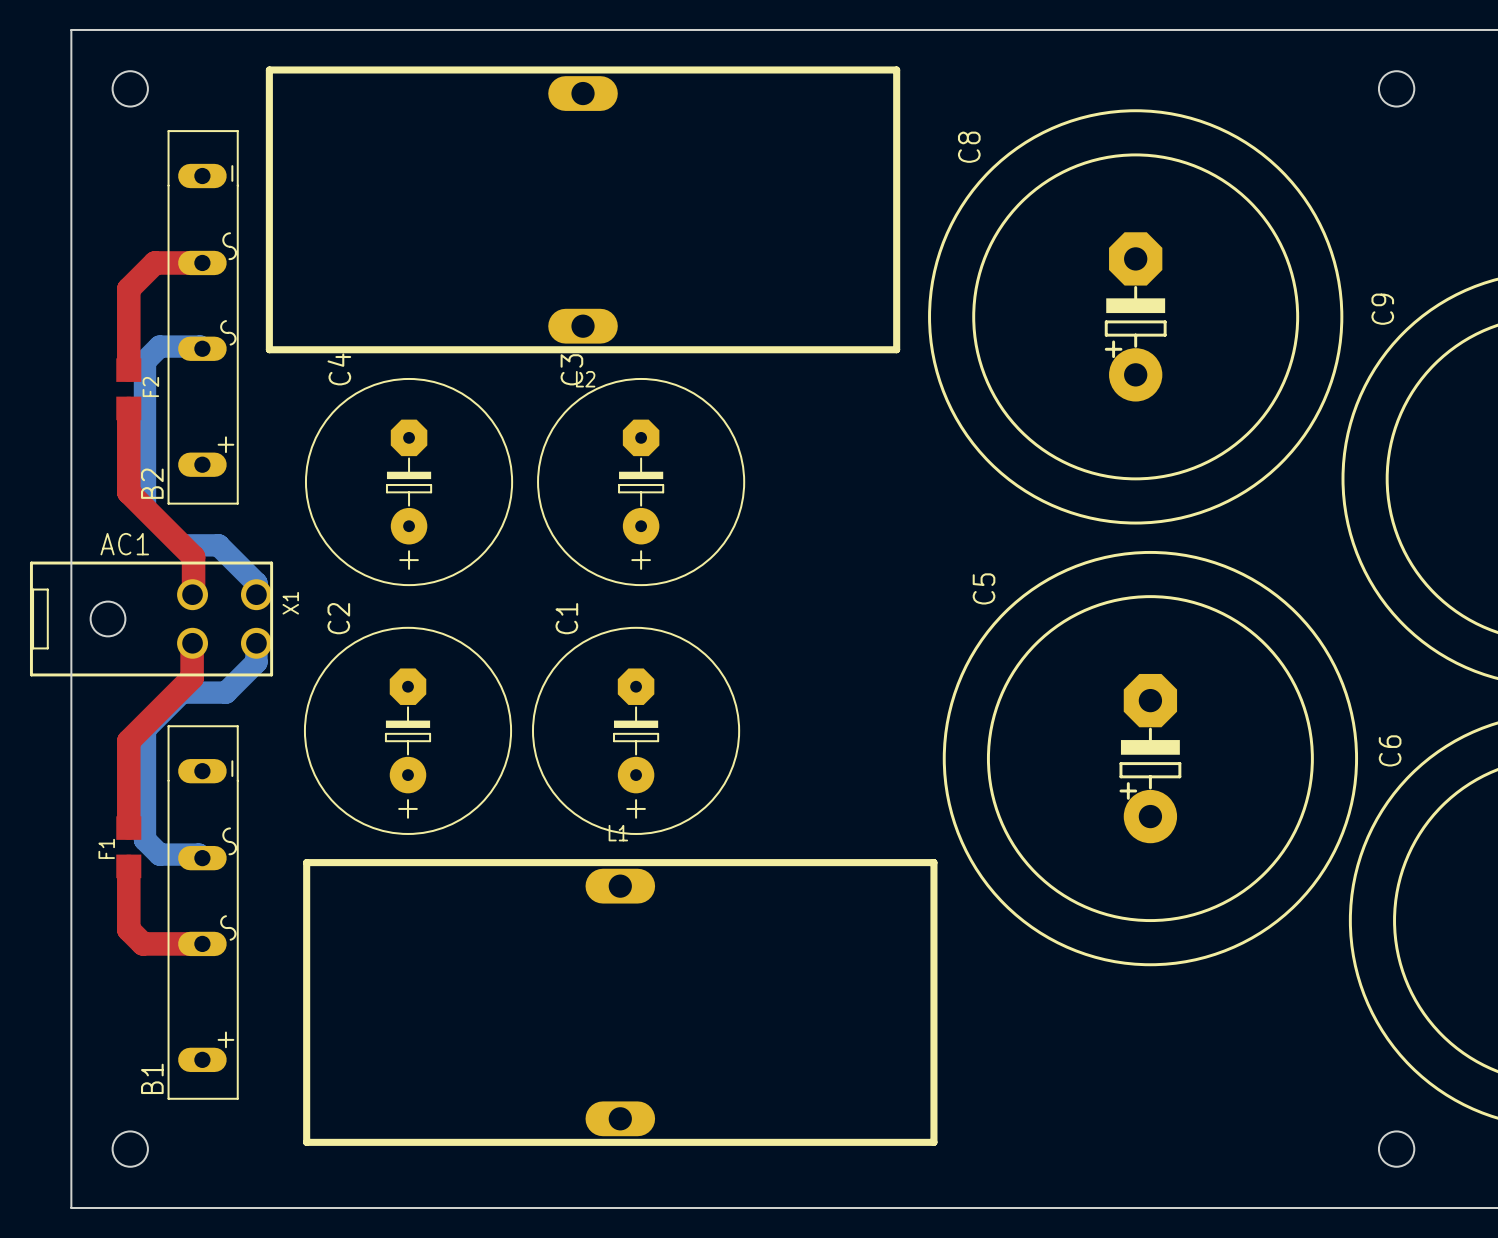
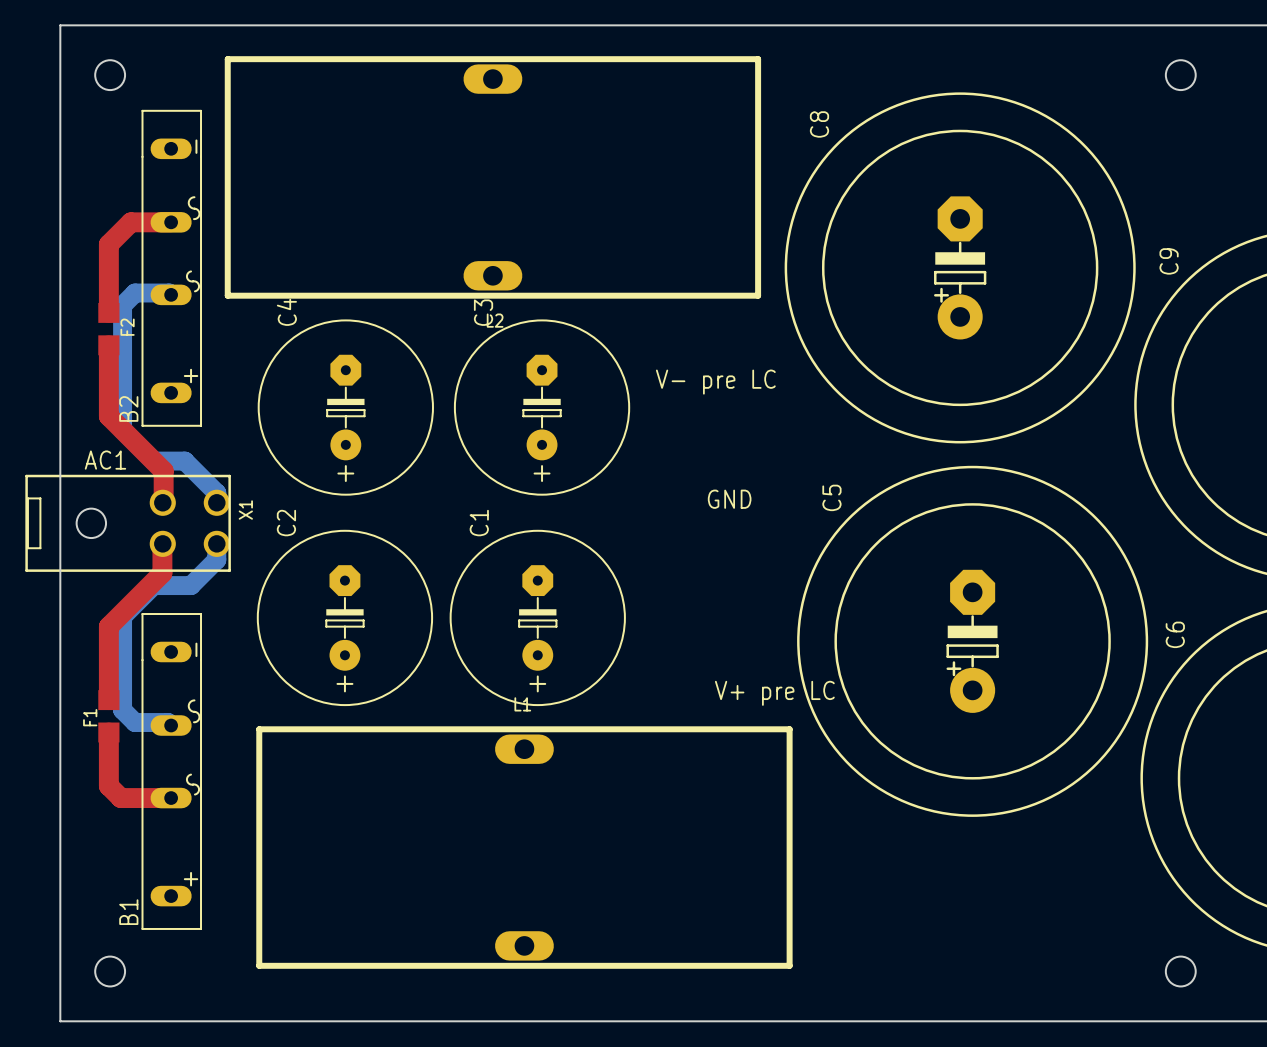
text: none -> V- pre LC (715, 382)
text: none -> GND (729, 499)
text: none -> V+ pre LC (774, 693)

